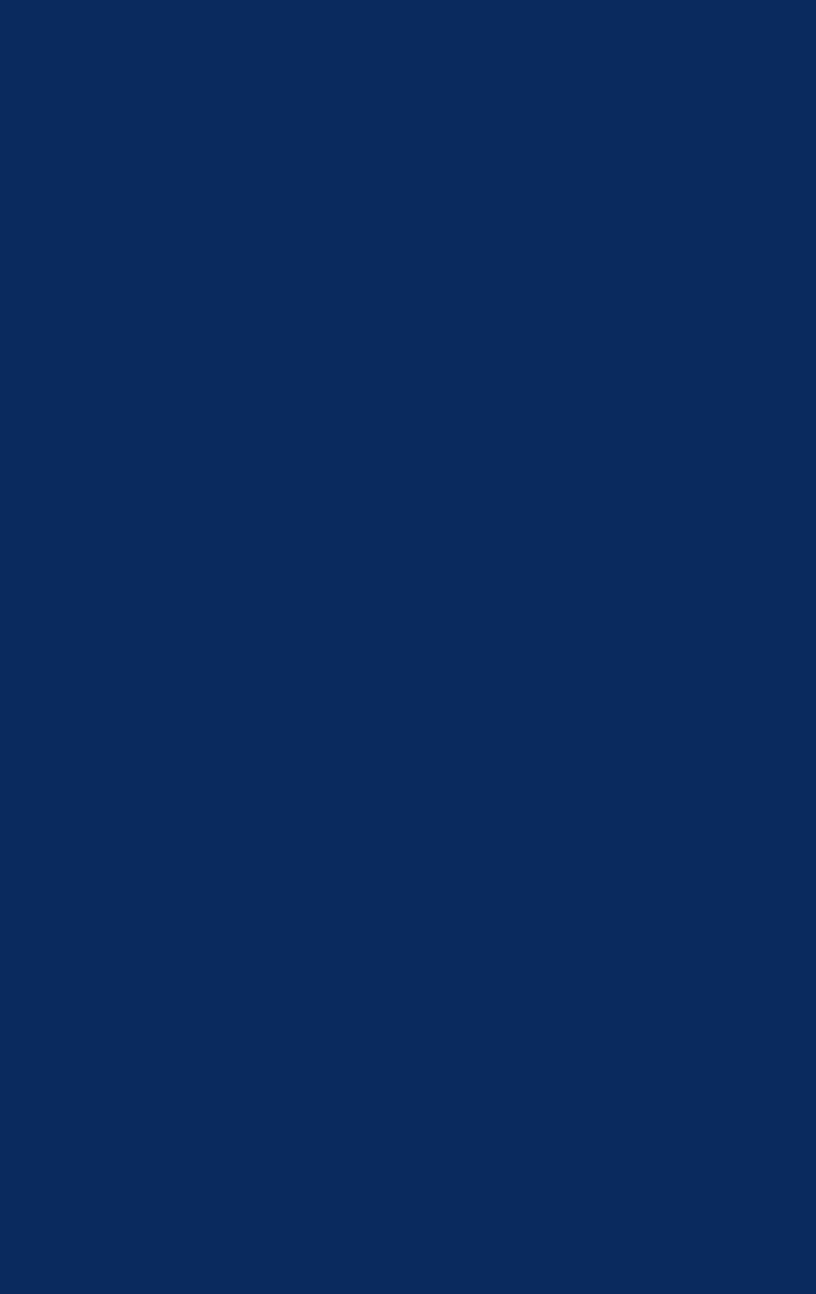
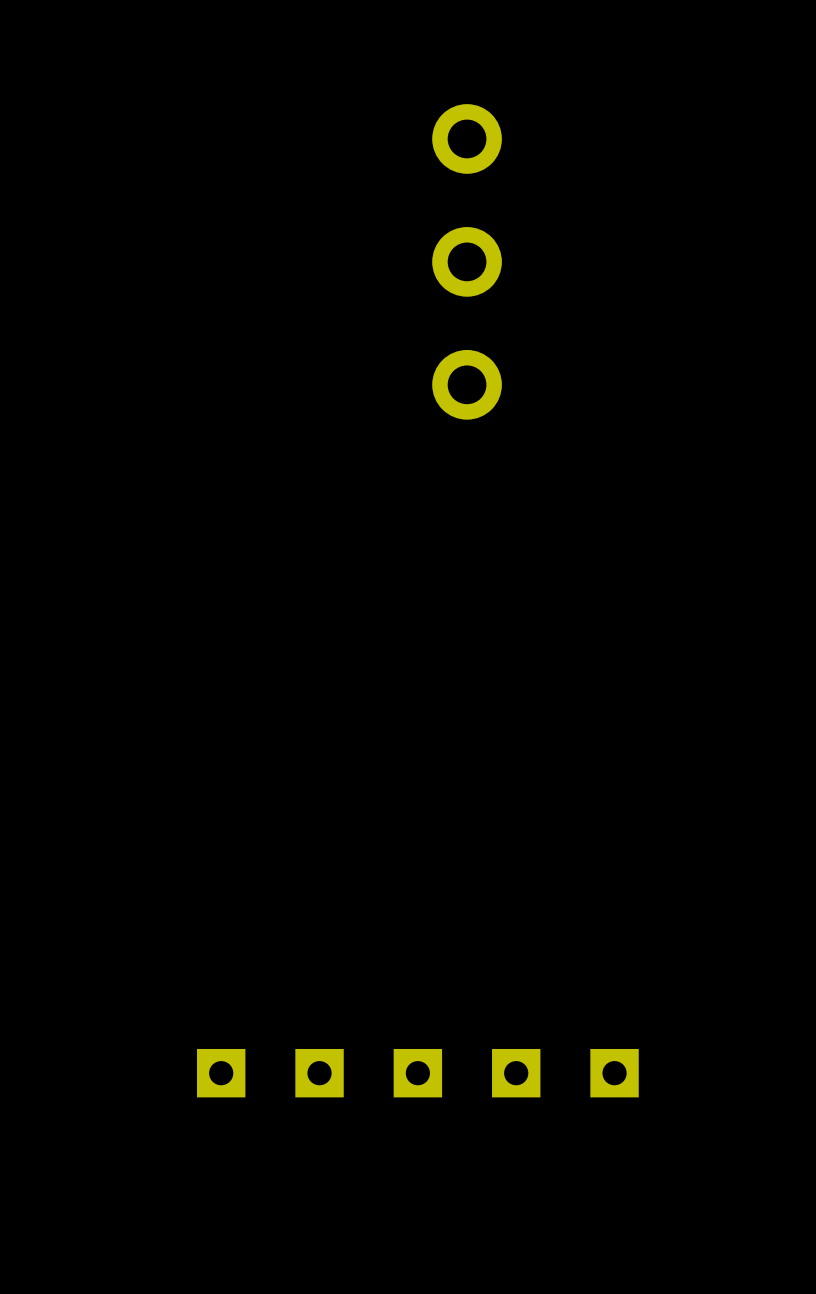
part: none -> (467, 261)
part: none -> (221, 1073)
part: none -> (319, 1073)
part: none -> (417, 1073)
part: none -> (516, 1073)
part: none -> (614, 1073)

